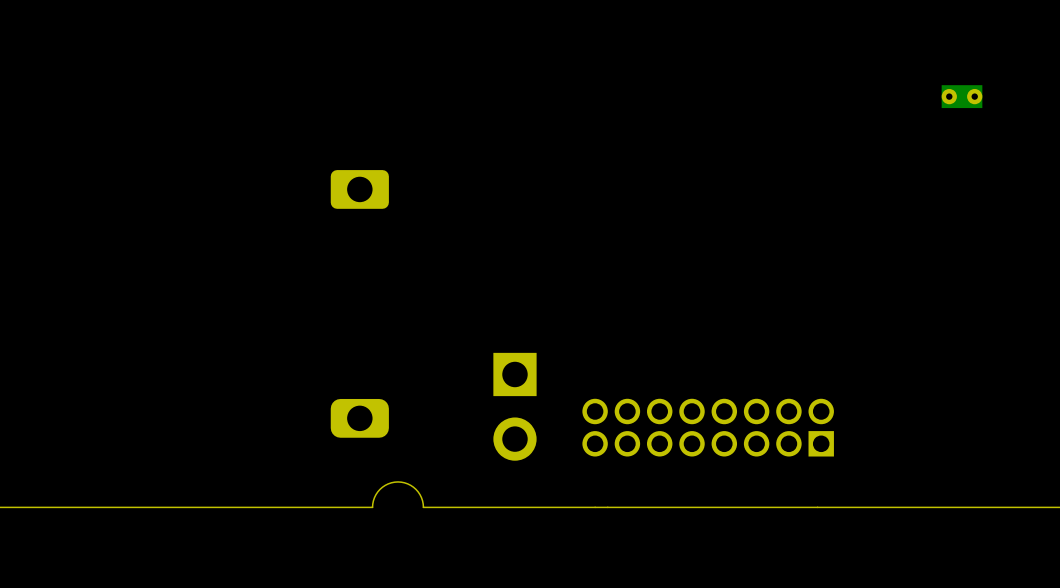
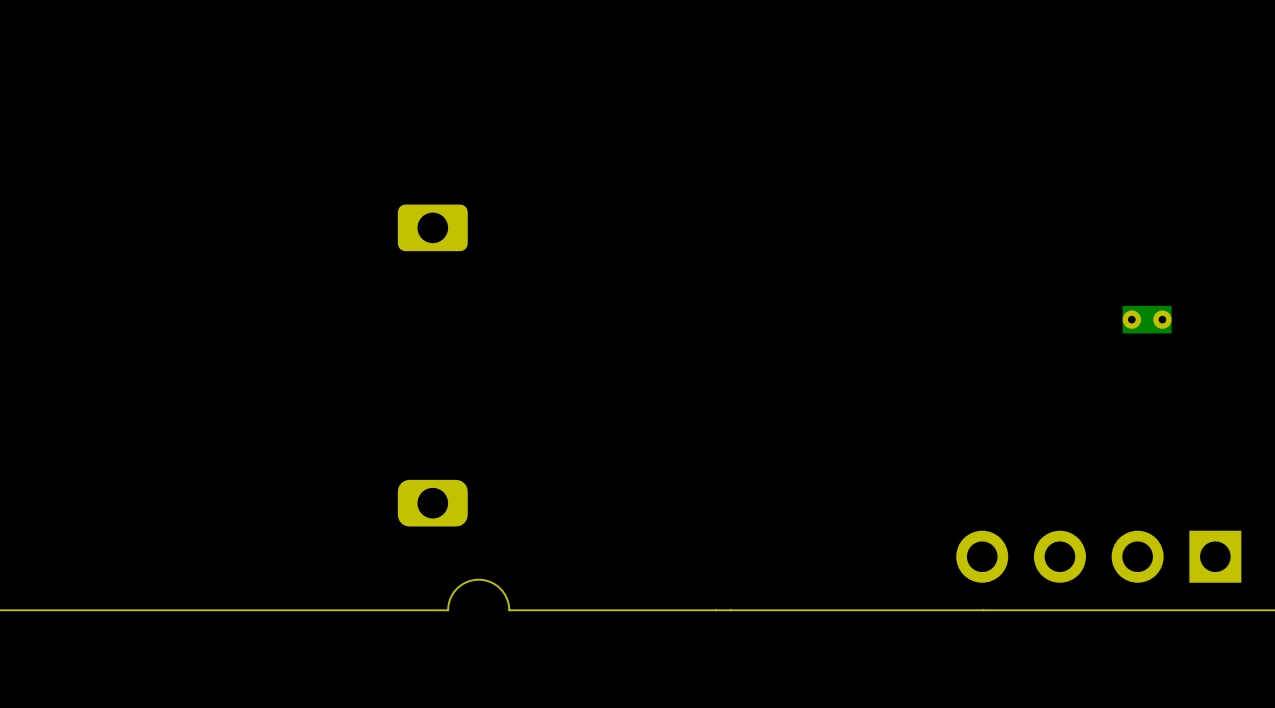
part position: (962, 96) -> (1147, 319)
part: (514, 406) -> none
part: (708, 427) -> none
part: none -> (1098, 556)

